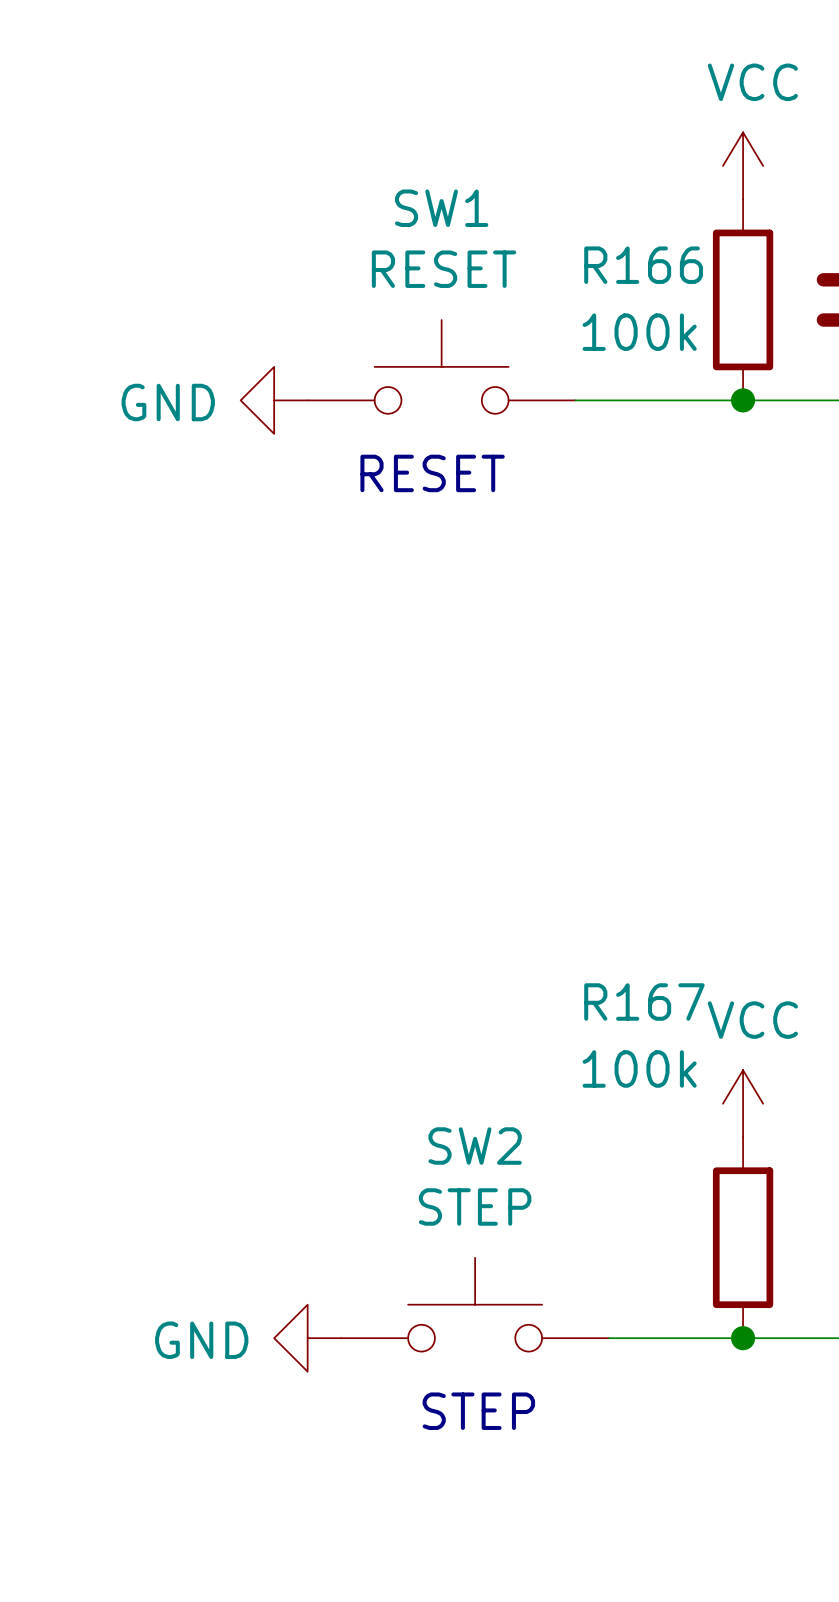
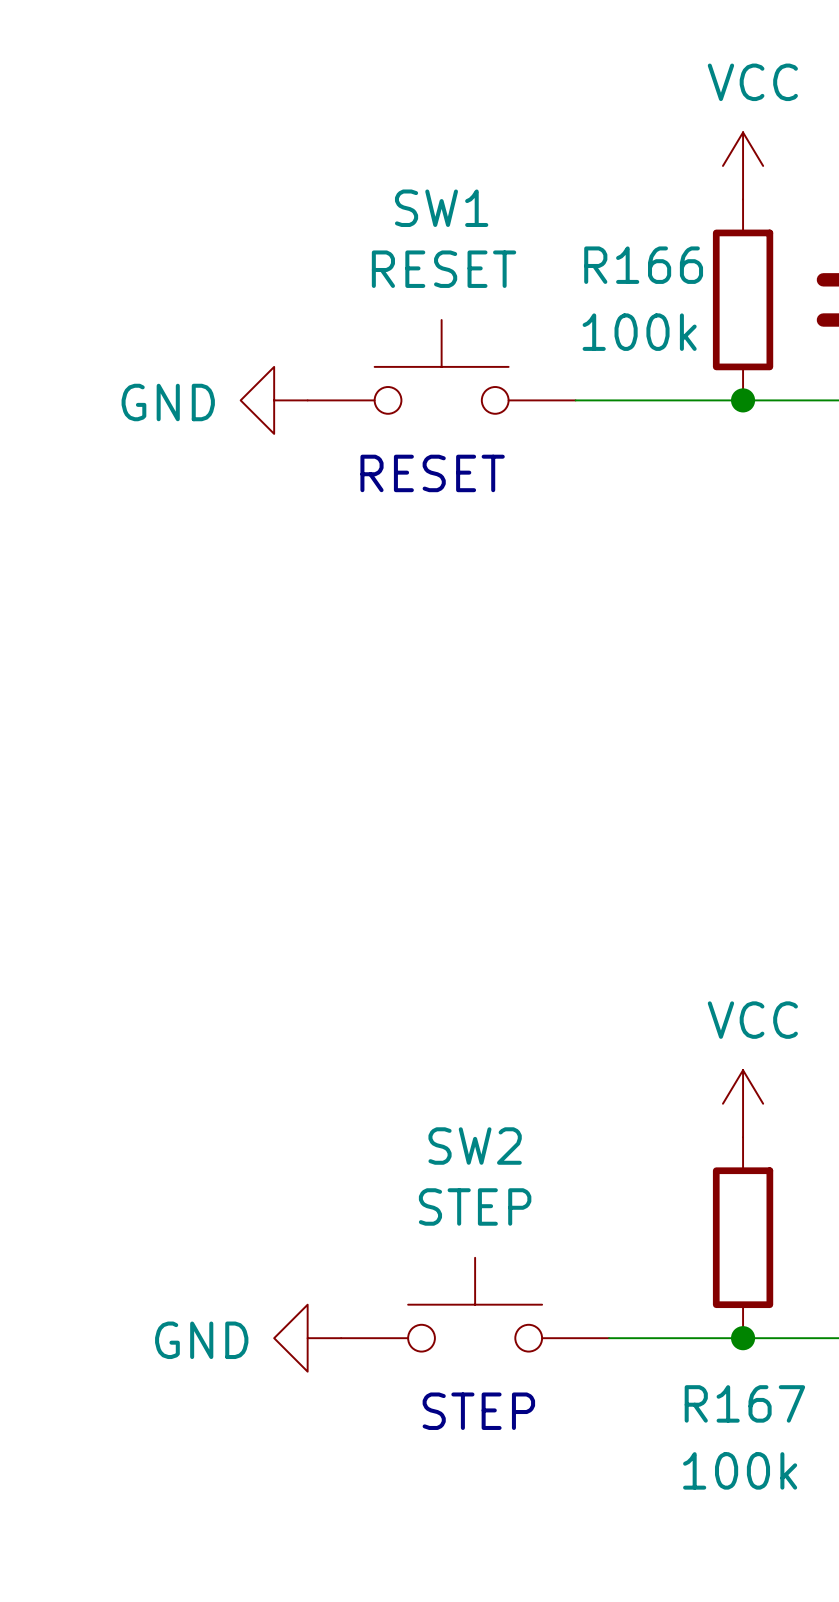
R167 name position: R167 (644, 1002) -> R167 (744, 1403)
R167 value position: 100k (639, 1068) -> 100k (740, 1470)

